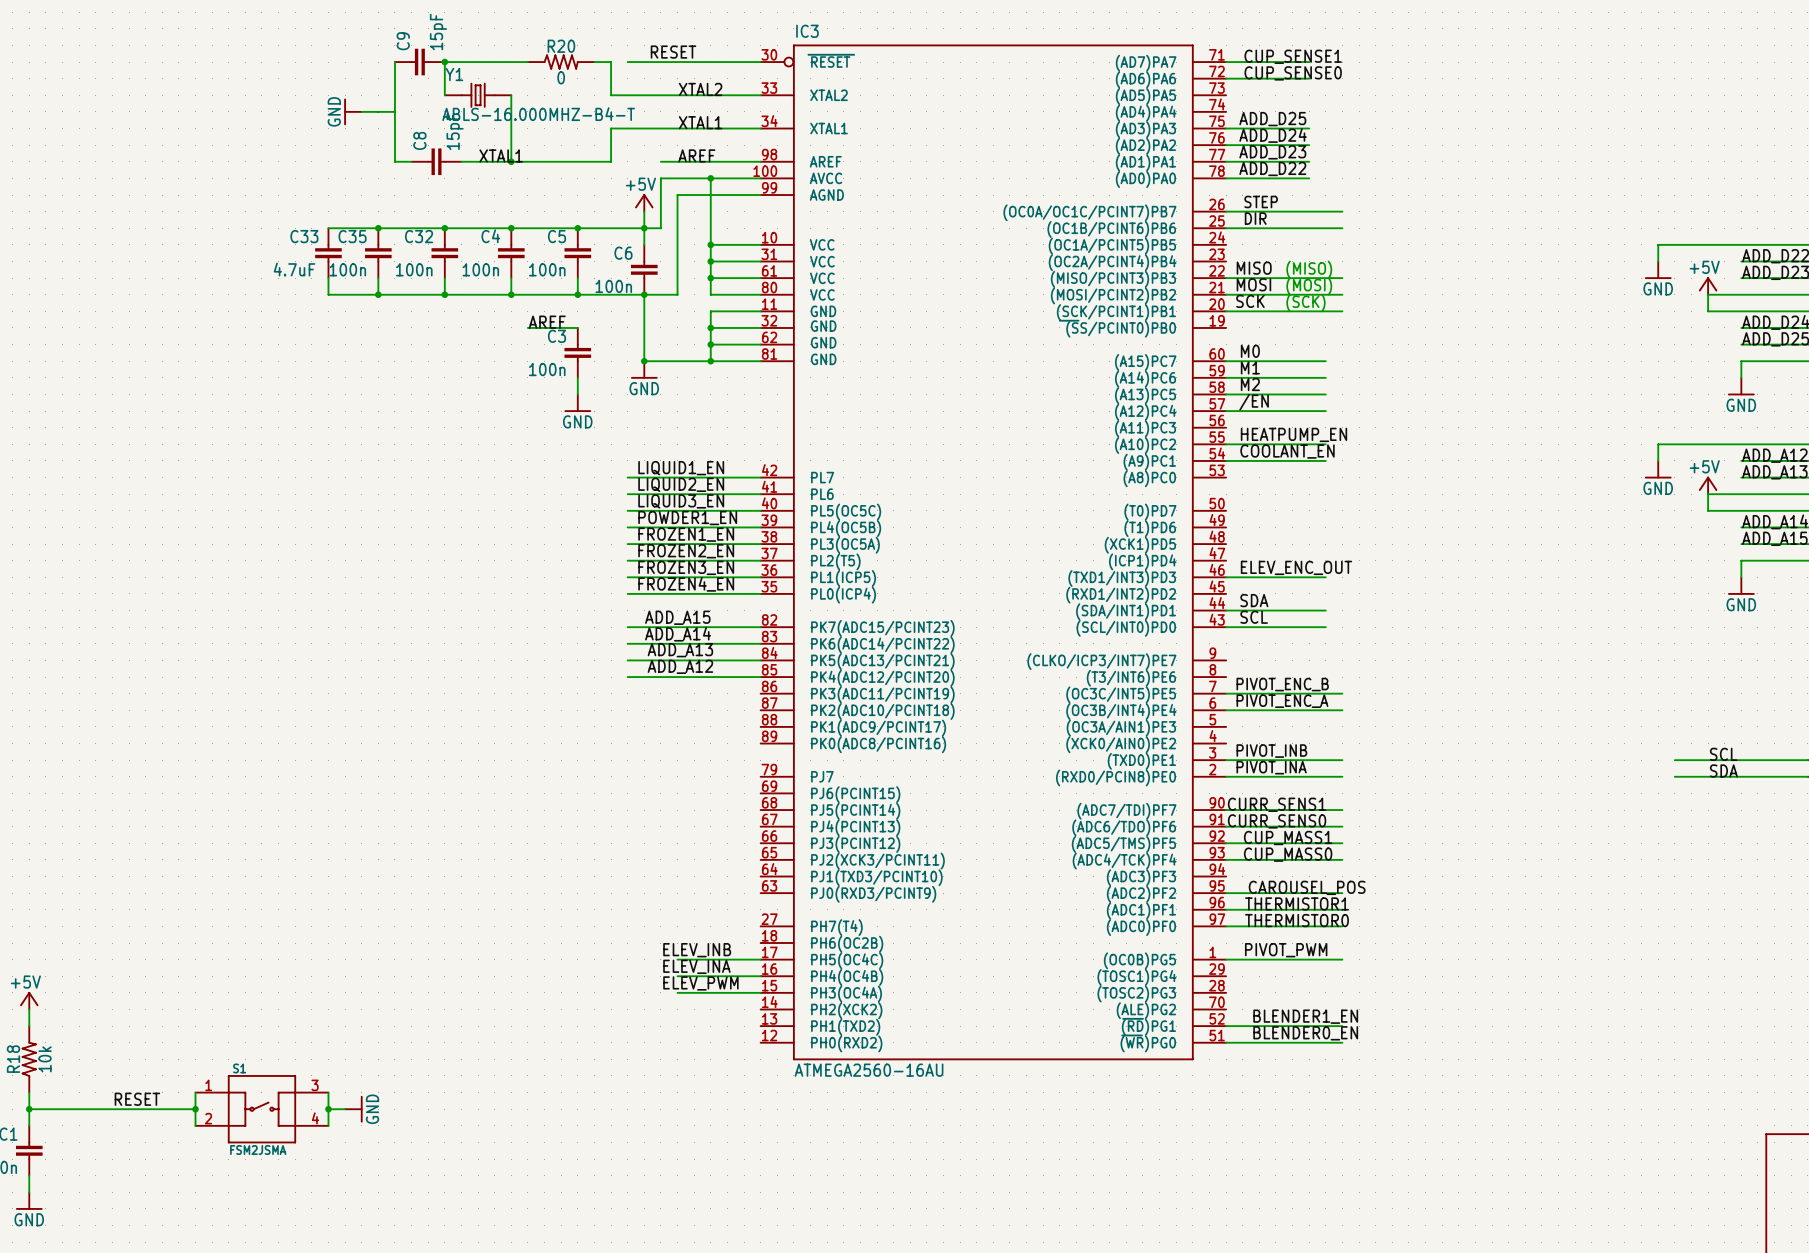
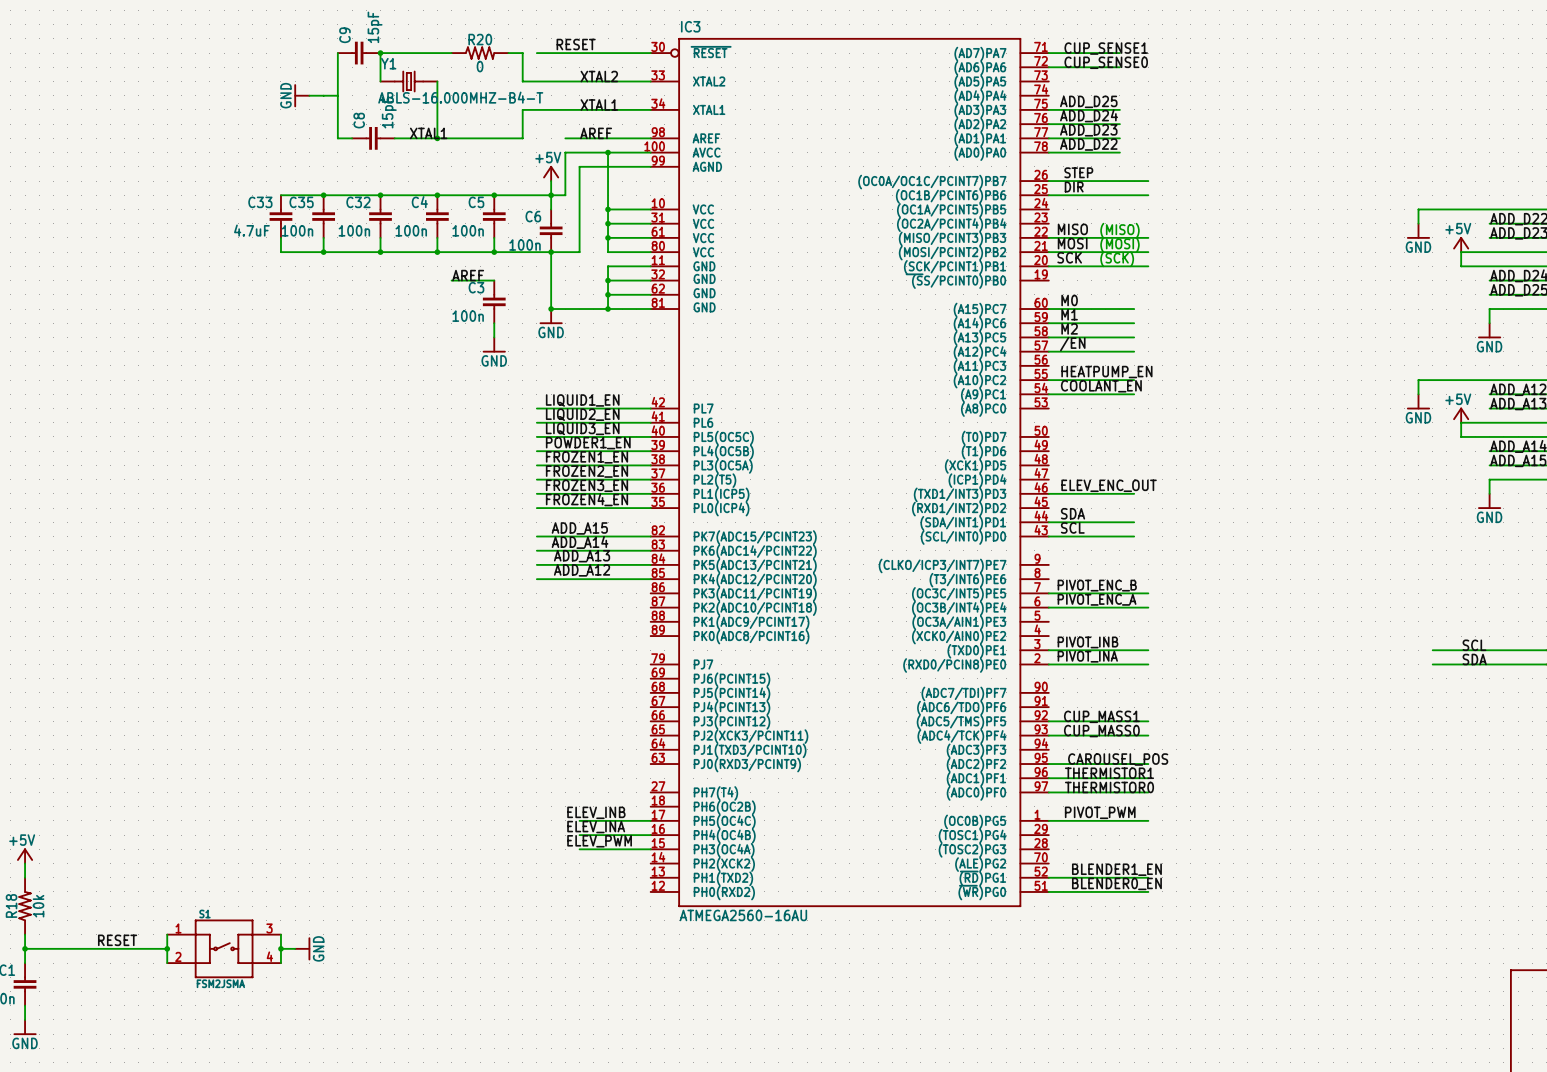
label: CURR_SENS1 (1277, 804) -> none
wire: (1226, 810) (1342, 810) -> none
label: CURR_SENS0 (1277, 821) -> none
wire: (1226, 826) (1342, 826) -> none

